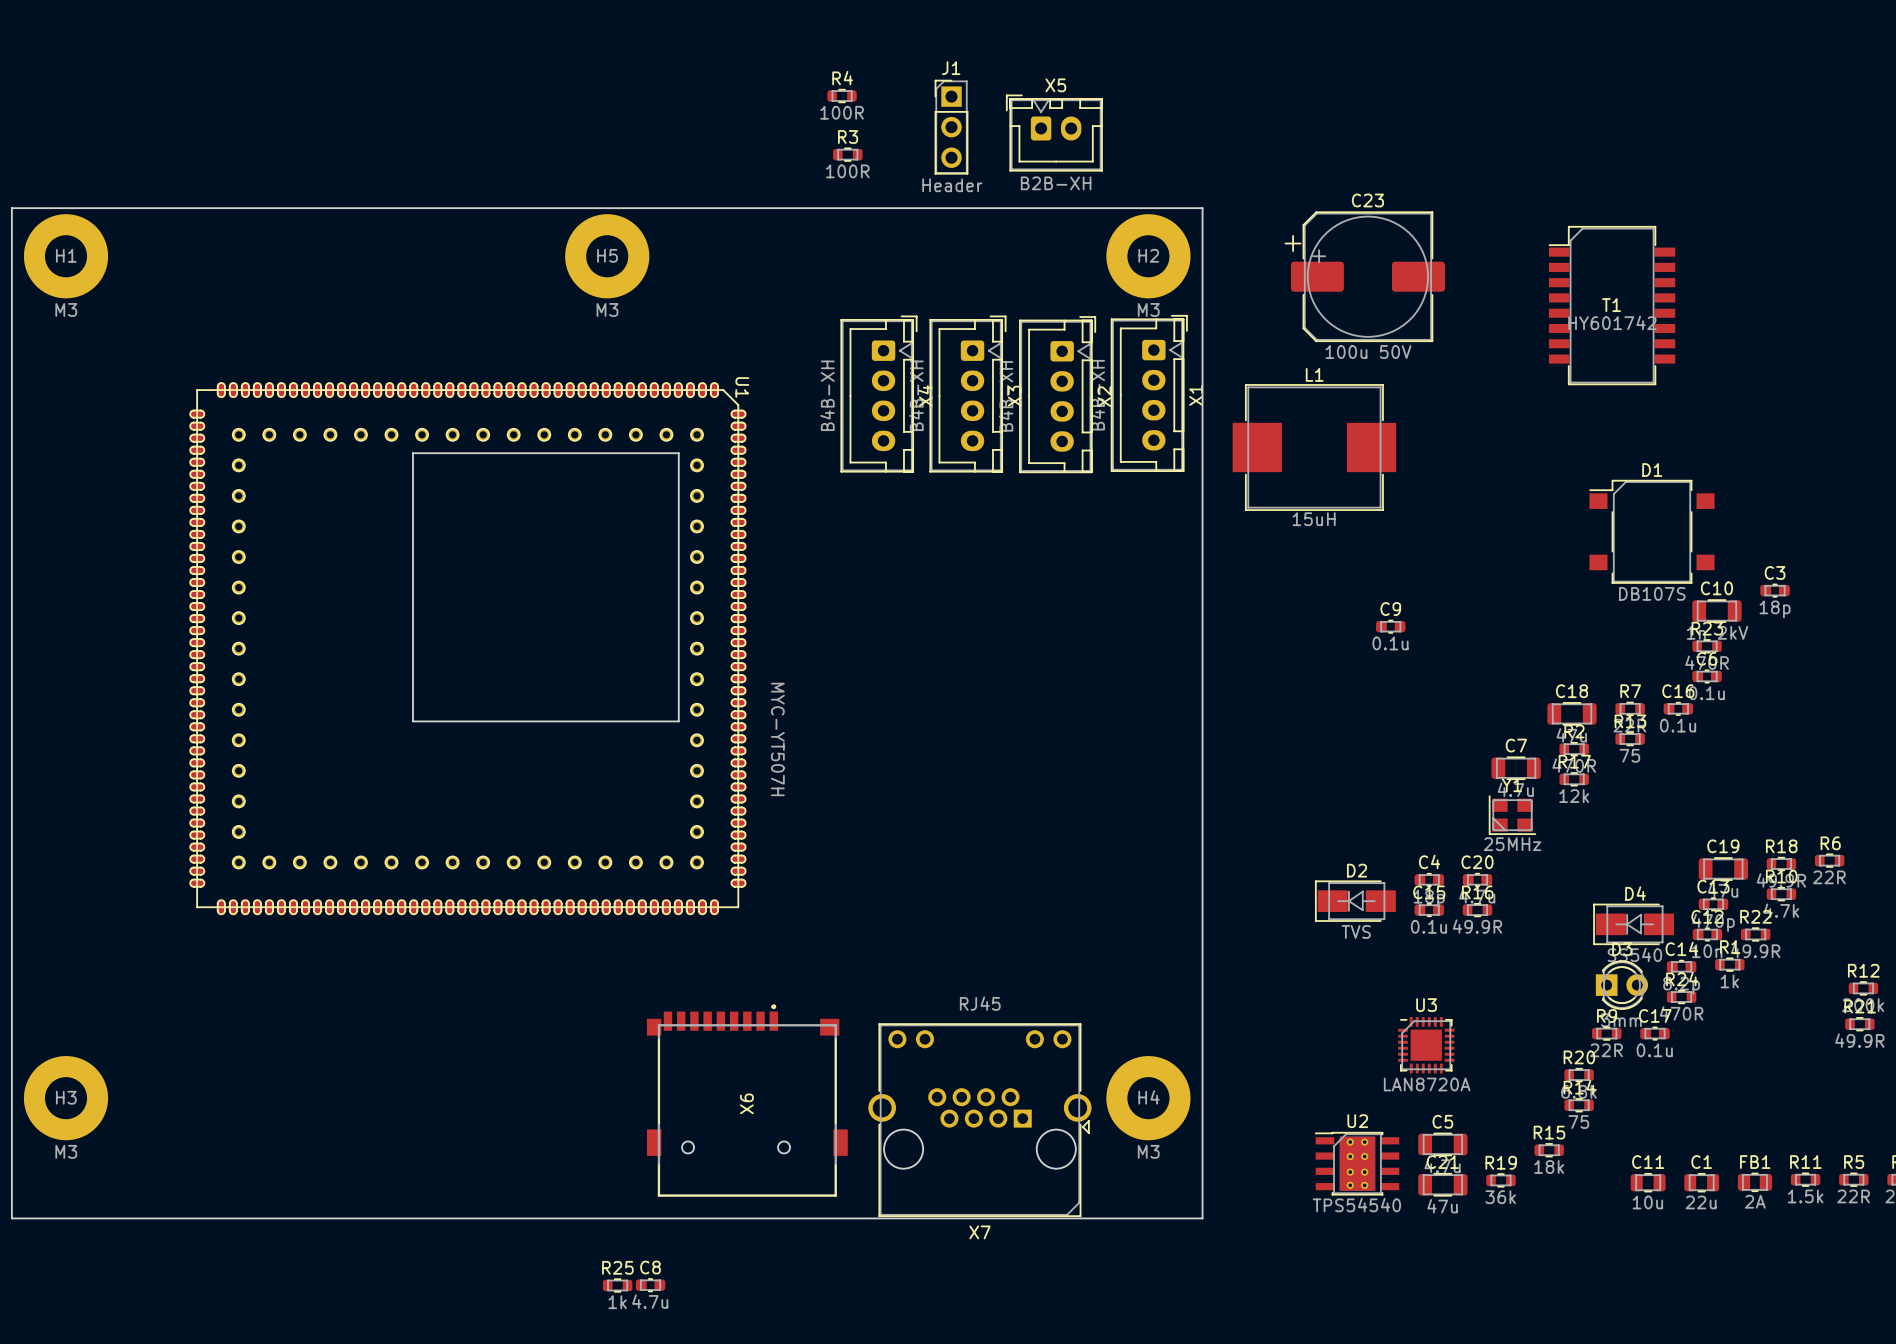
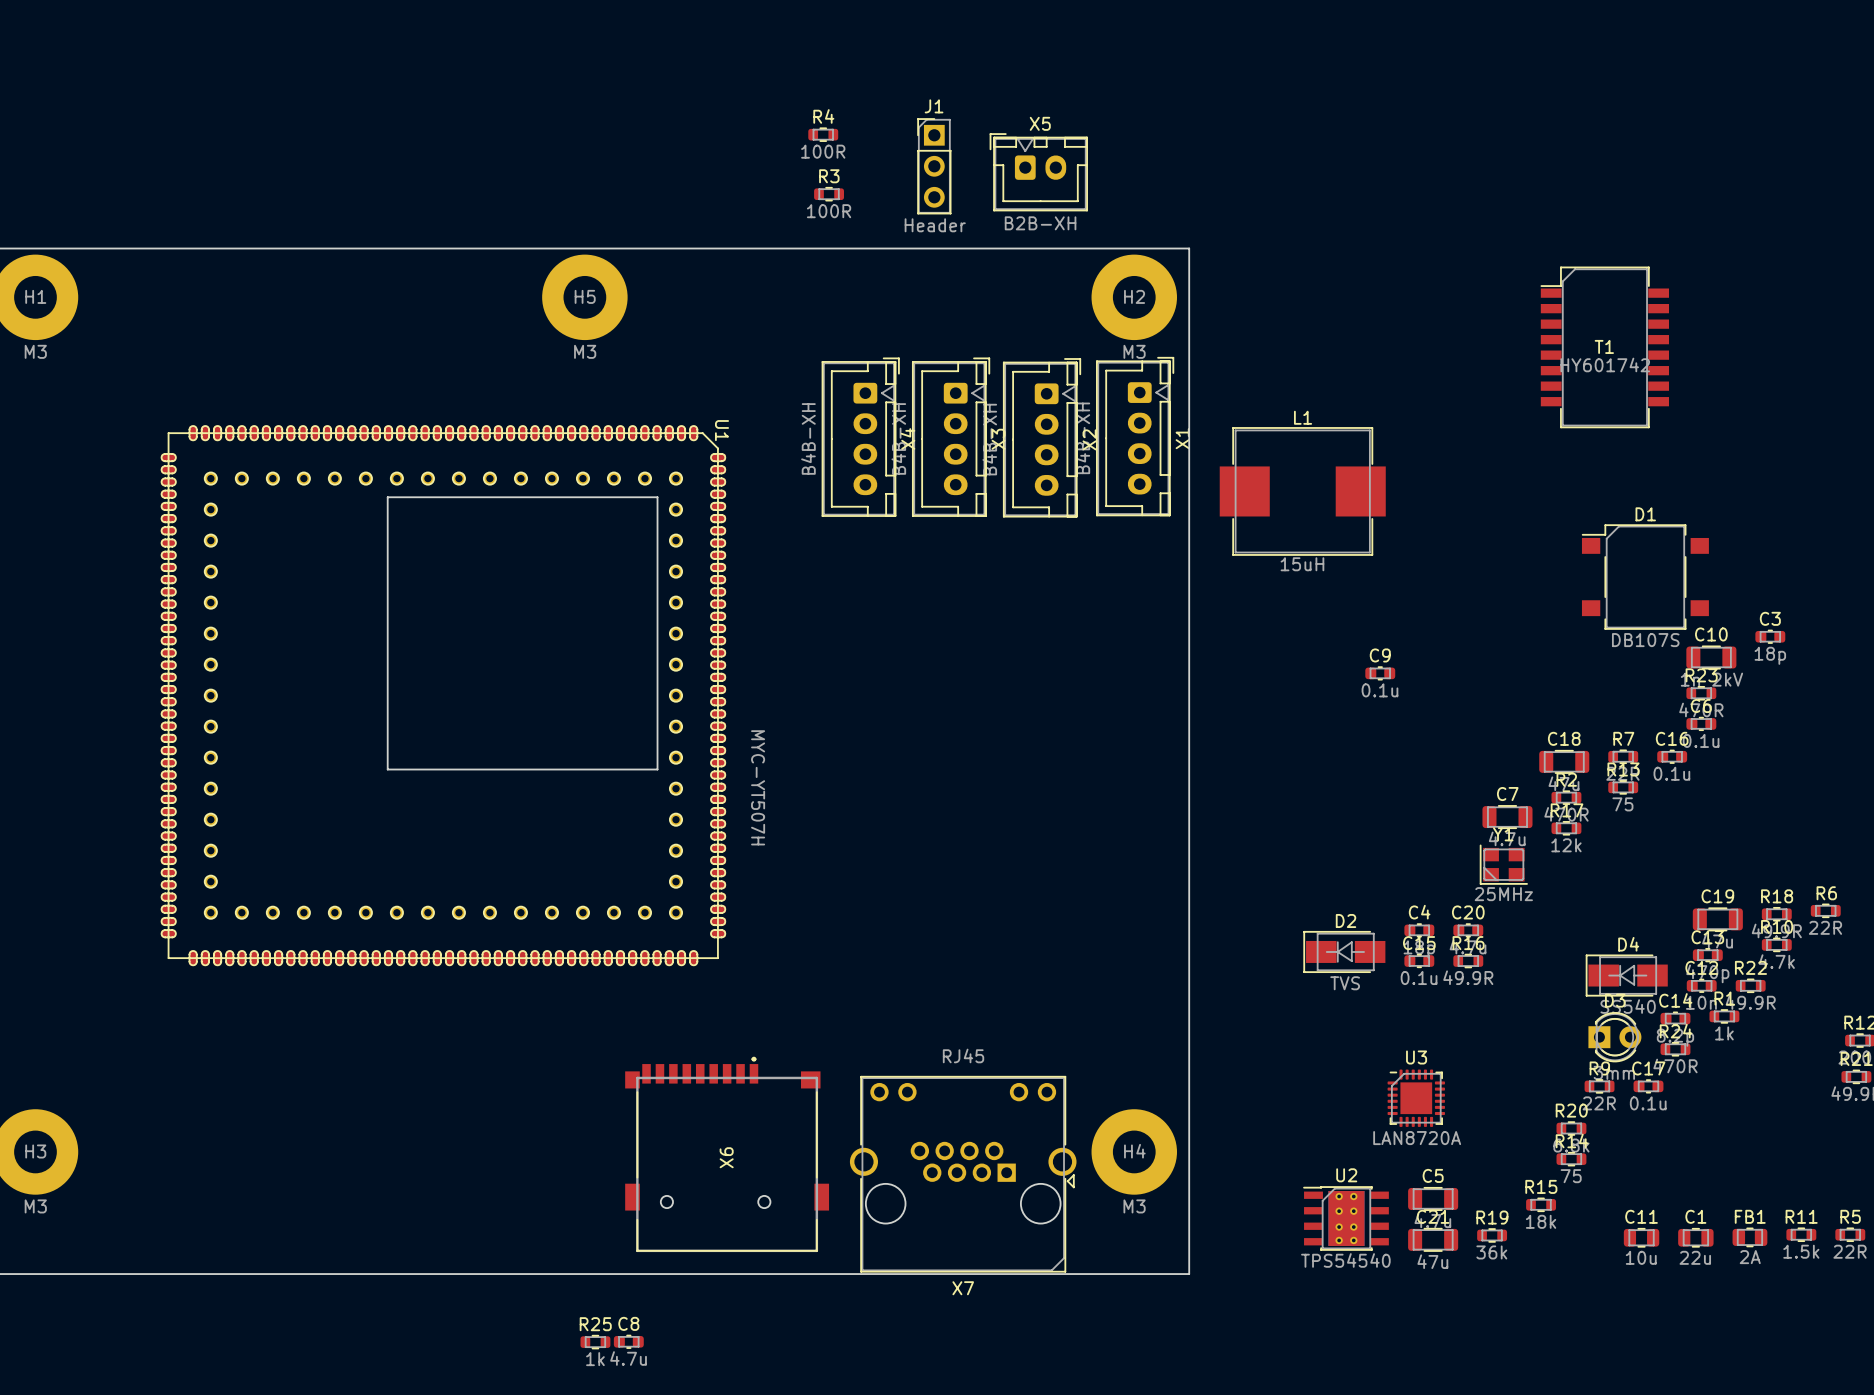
C23: 100u 50V (1364, 276) -> none

